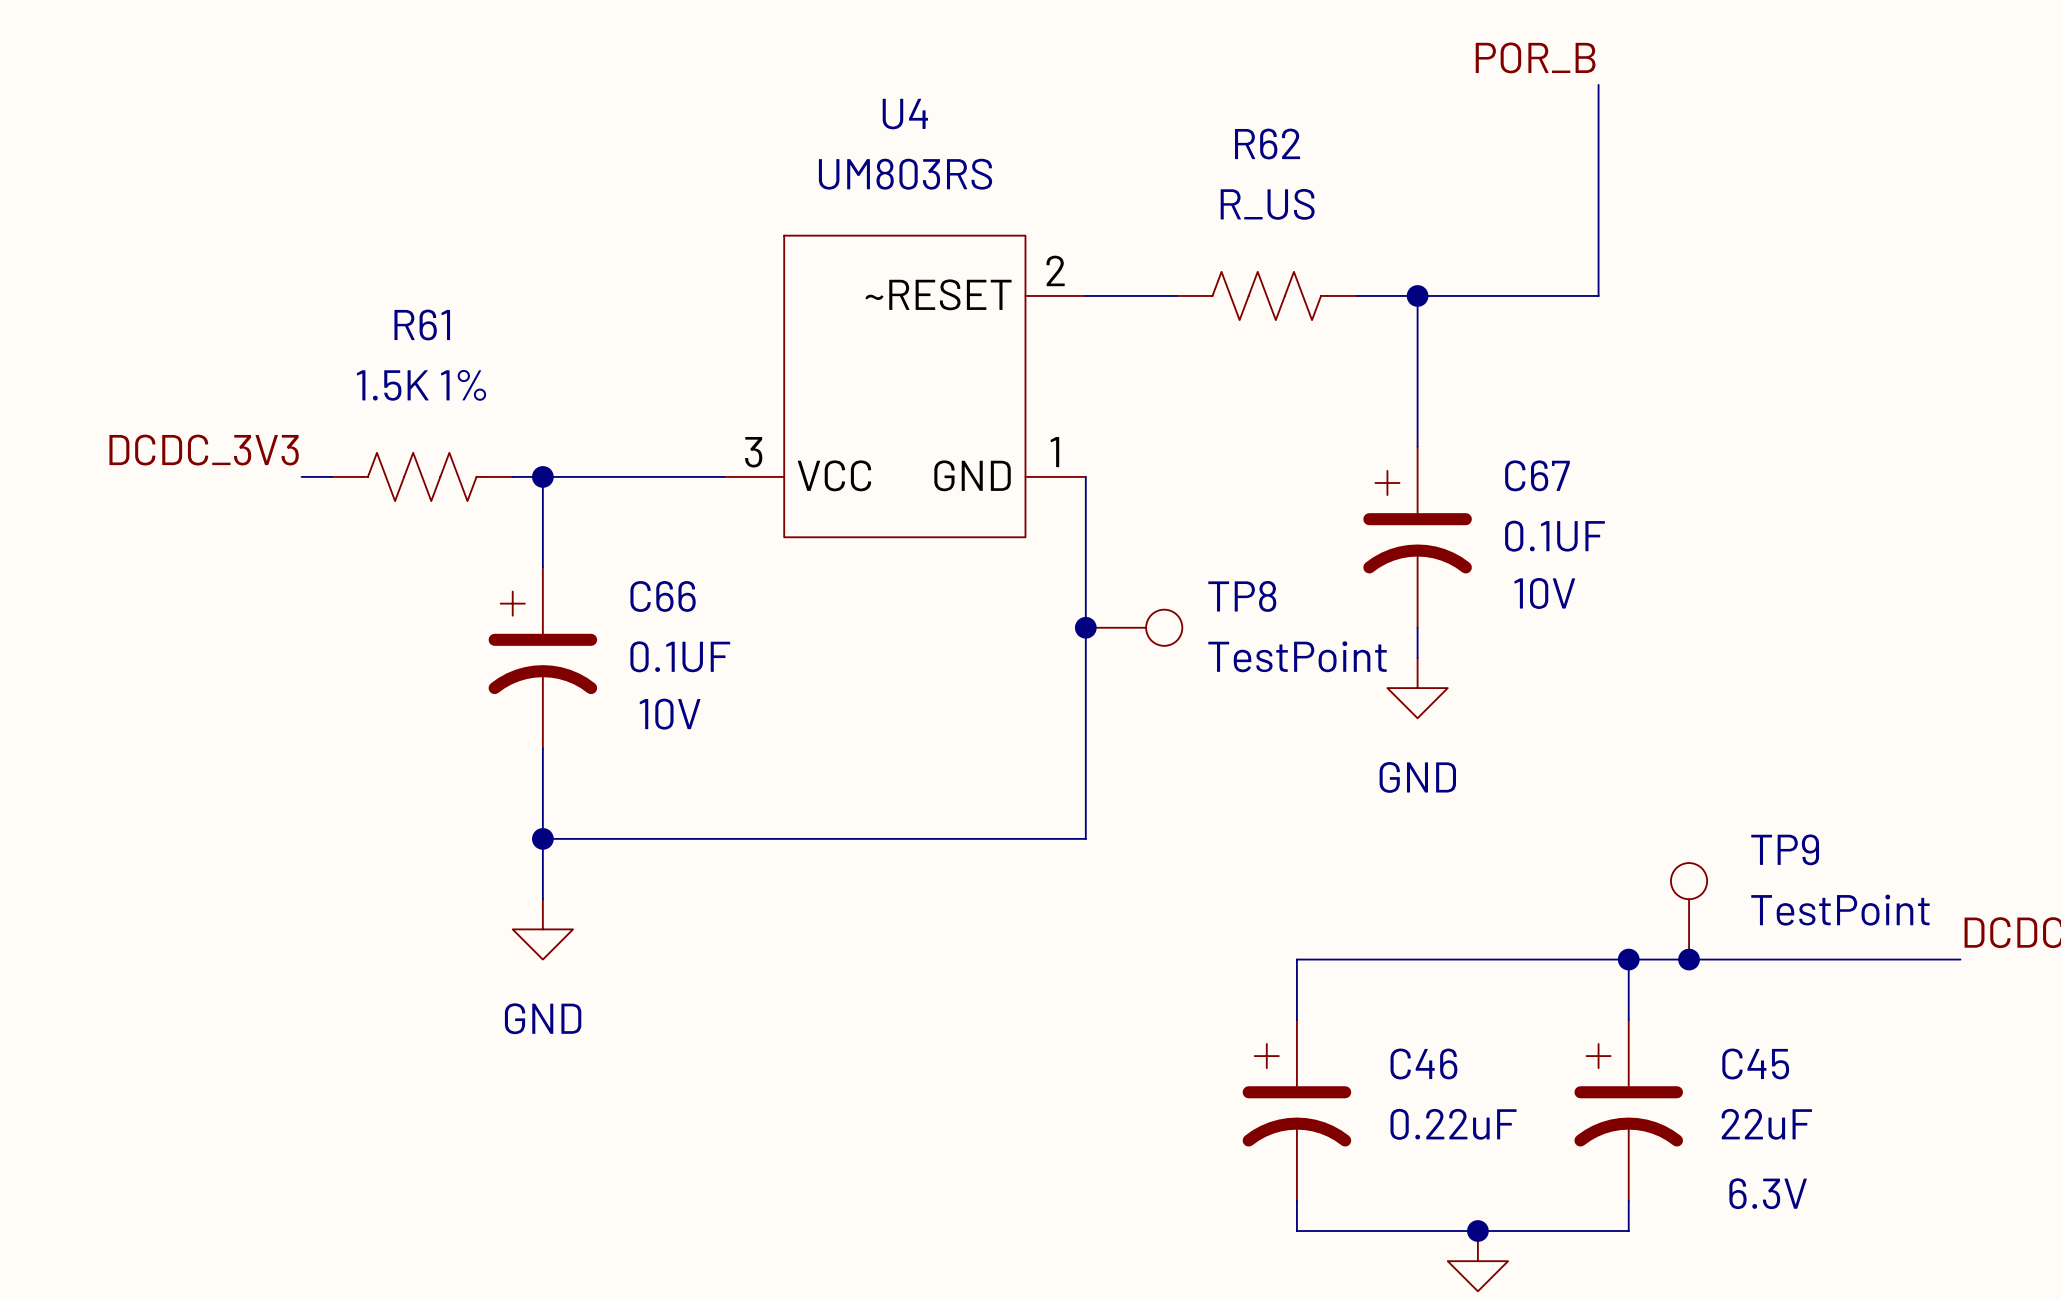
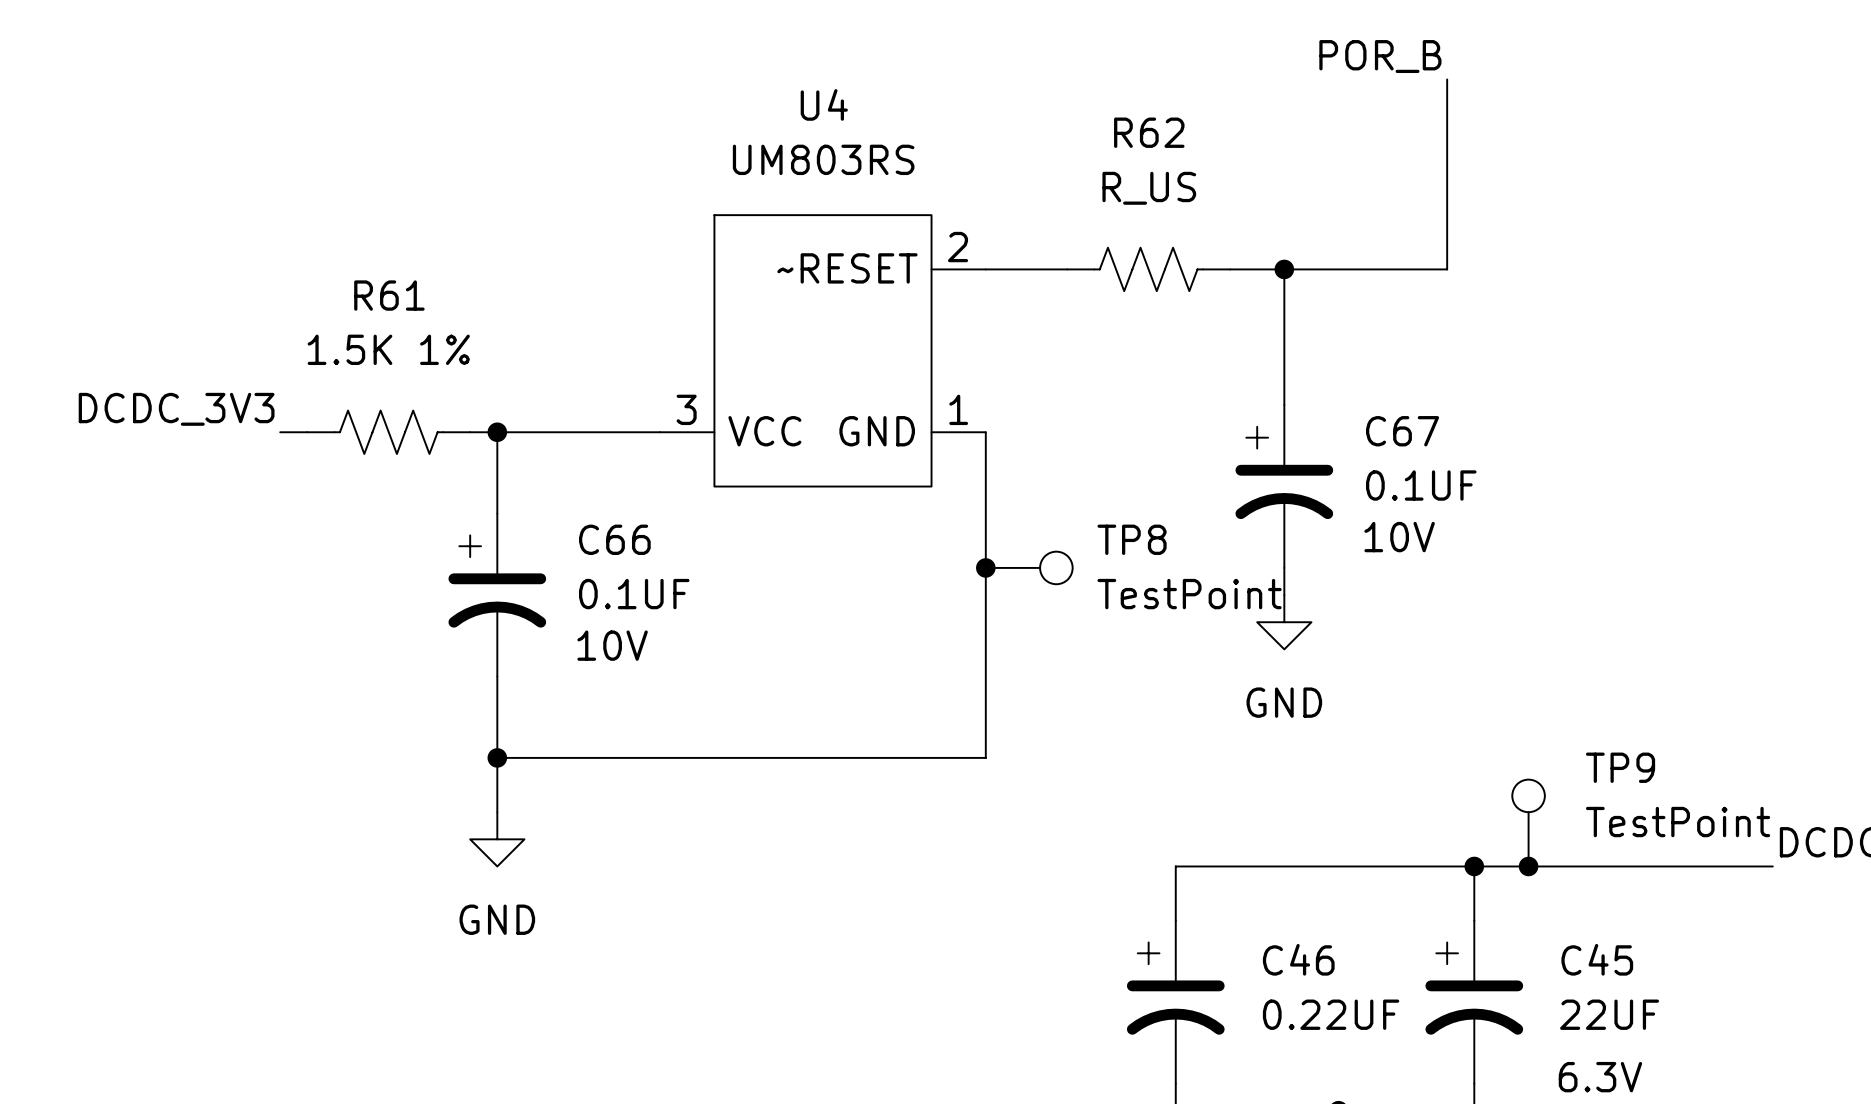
C46 value: 0.22uF (1453, 1124) -> 0.22UF (1331, 1014)
C45 value: 22uF (1766, 1124) -> 22UF (1609, 1014)

